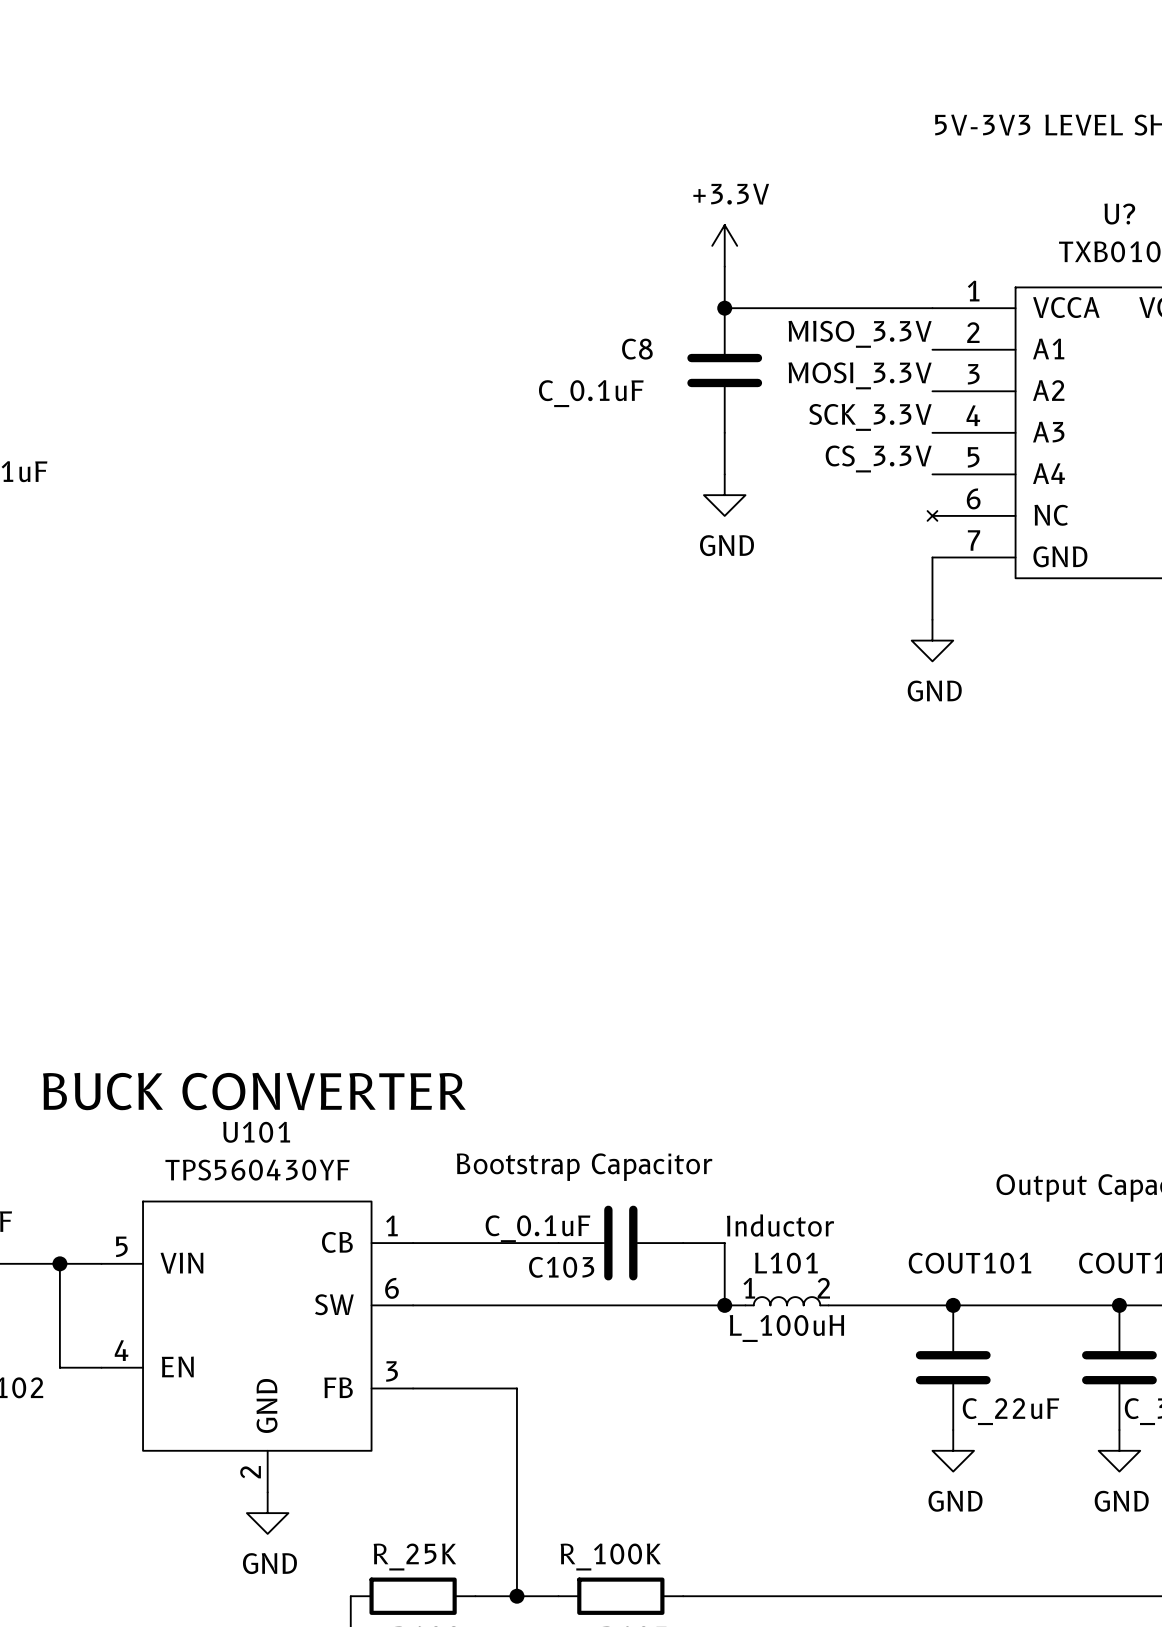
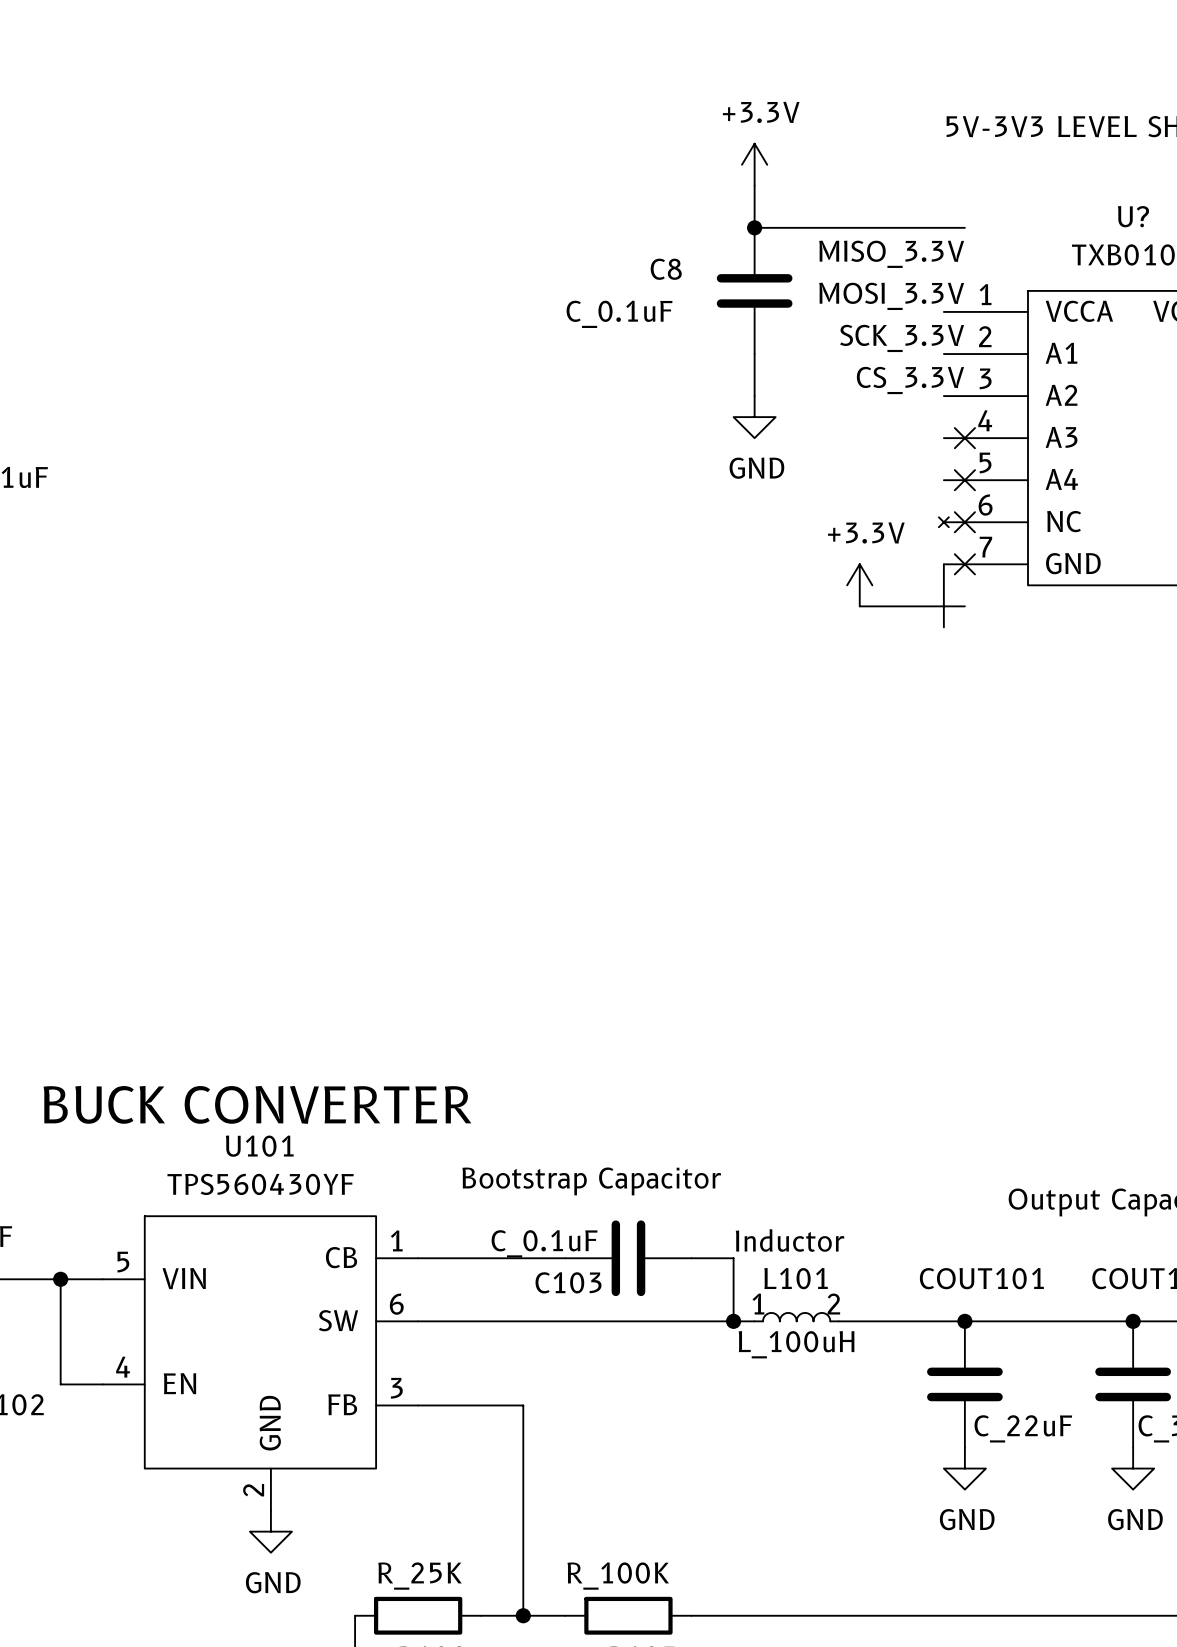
power symbol position: +3.3V (724, 245) -> +3.3V (754, 164)
wire: (724, 266) (724, 308) (932, 308) -> (754, 185) (754, 227) (964, 227)
junction position: (724, 308) -> (754, 227)
label position: MISO_3.3V (860, 334) -> MISO_3.3V (891, 254)
C8 position: (724, 370) -> (754, 290)
label position: MOSI_3.3V (860, 375) -> MOSI_3.3V (891, 296)
label position: SCK_3.3V (870, 417) -> SCK_3.3V (902, 338)
wire: (724, 432) (724, 474) -> (754, 354) (754, 396)
no-connect mark: none -> (964, 438)
label position: CS_3.3V (878, 458) -> CS_3.3V (910, 380)
no-connect mark: none -> (964, 480)
power symbol position: GND (724, 495) -> GND (754, 417)
no-connect mark: none -> (964, 522)
no-connect mark: none -> (964, 564)
power symbol: none -> +3.3V (859, 585)
wire: none -> (859, 606) (964, 606)
power symbol: GND (932, 640) -> none

